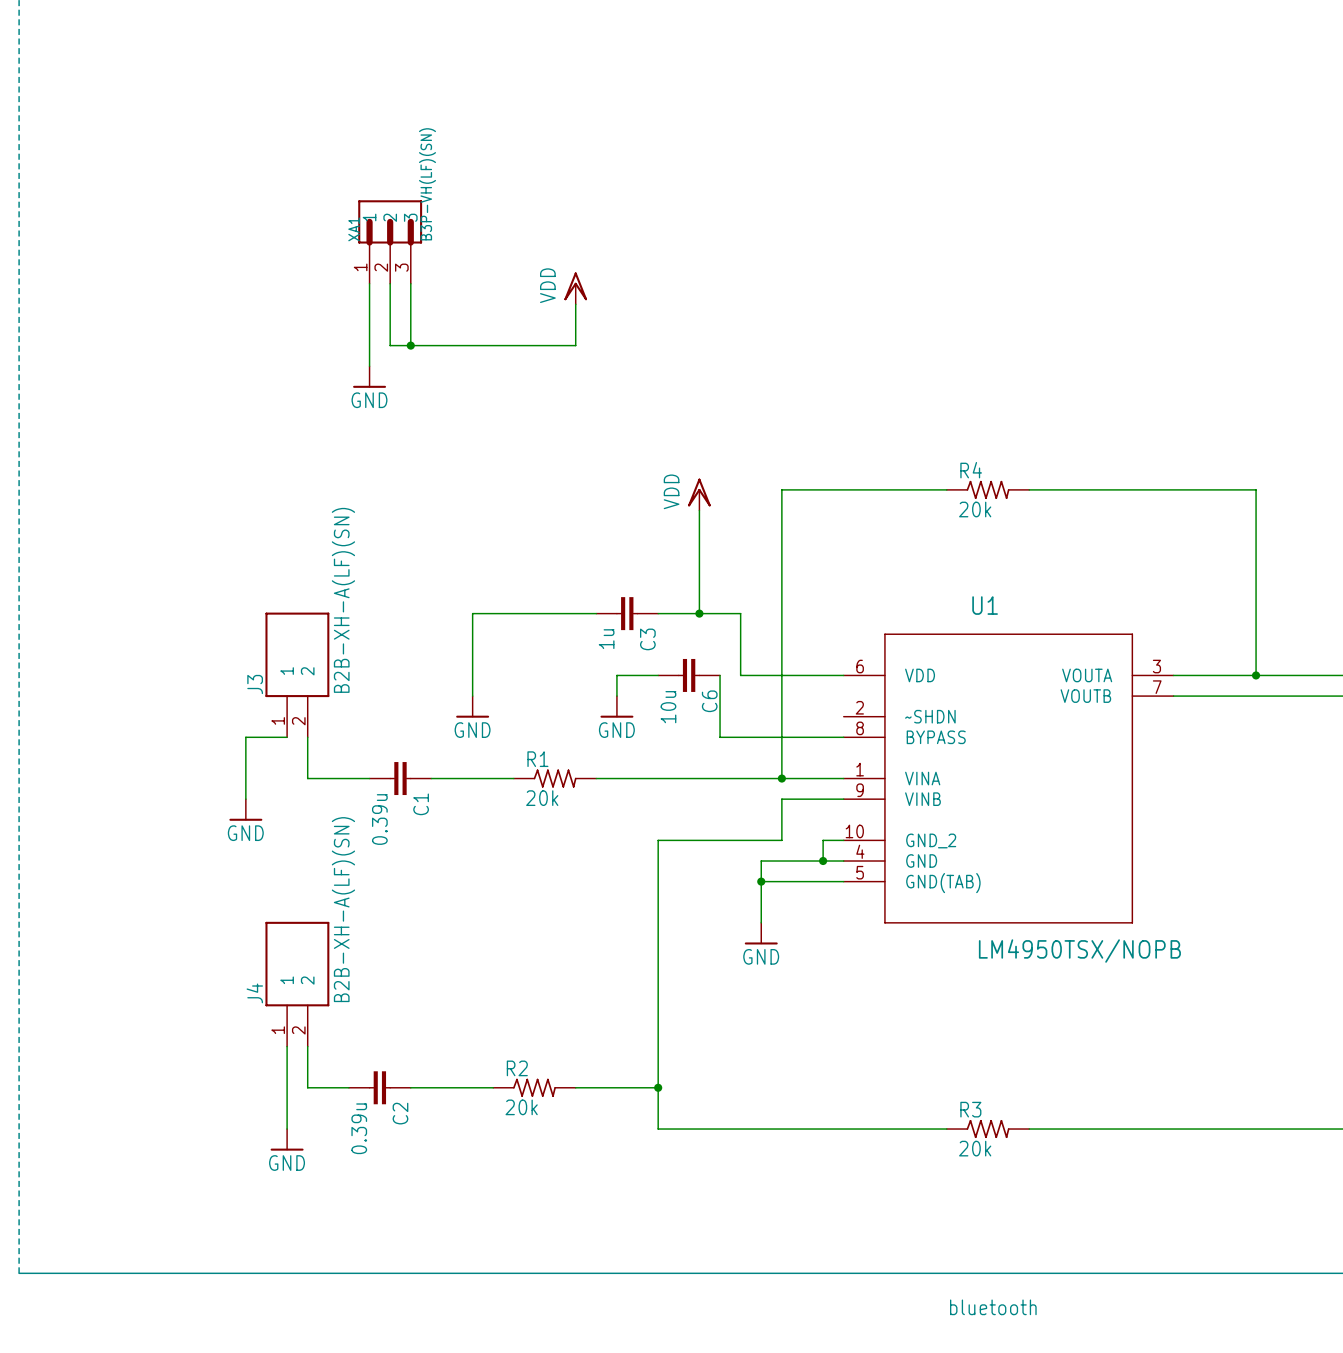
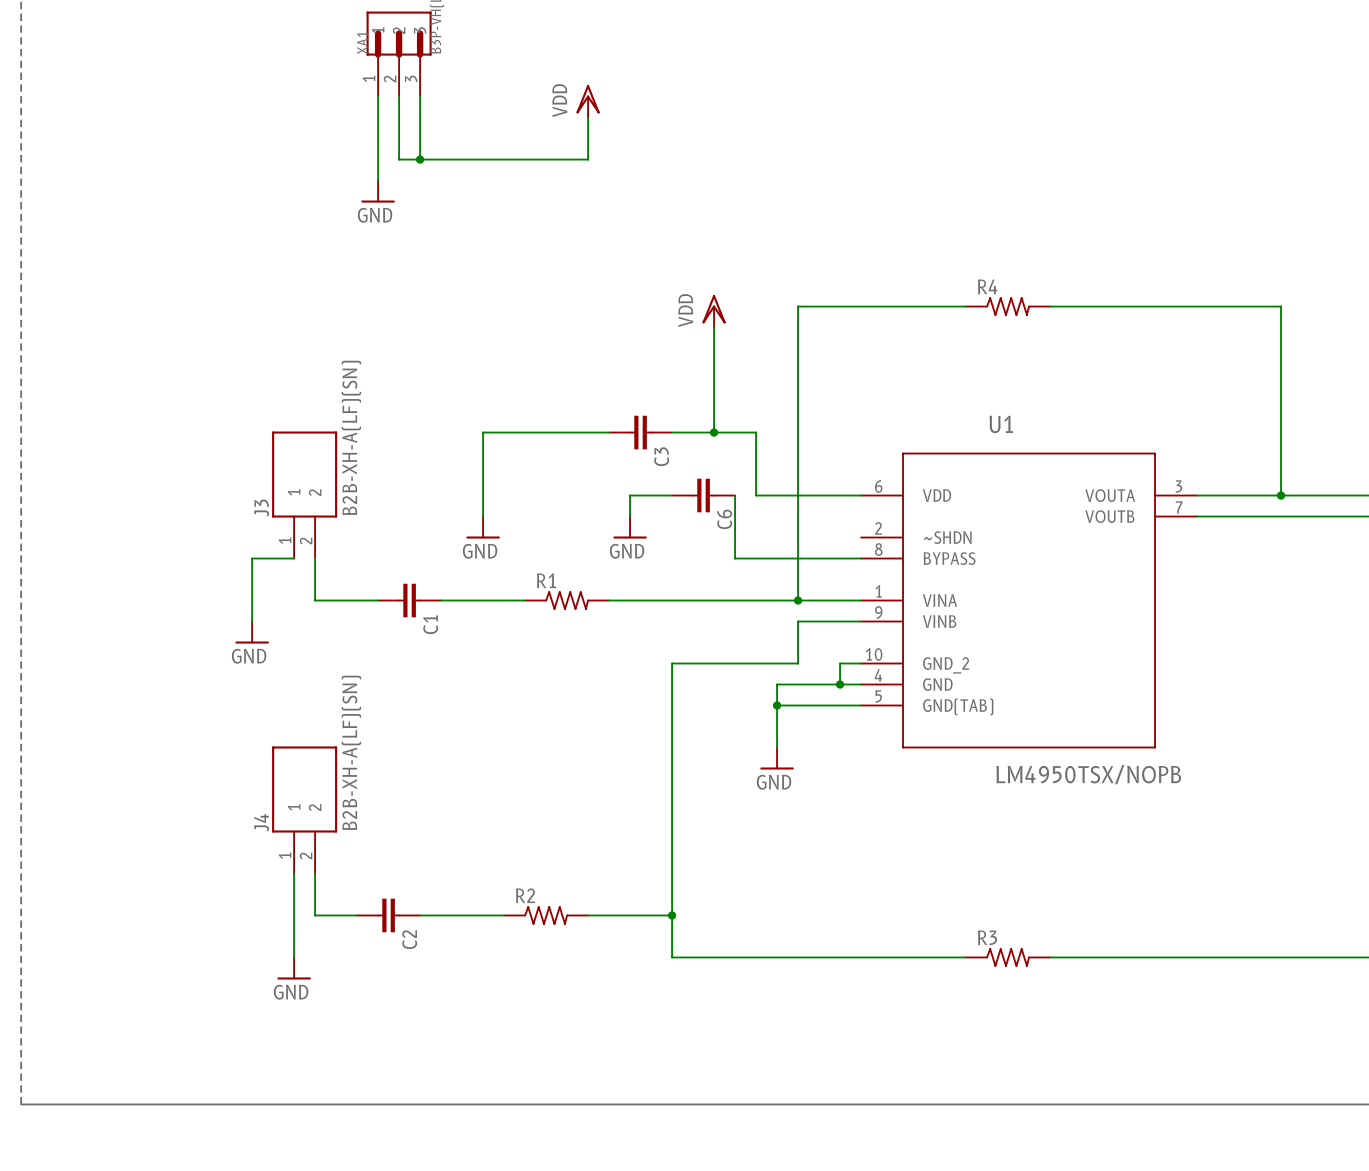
R4 value: 20k (975, 509) -> none
C3 value: 1u (606, 639) -> none
C6 value: 10u (668, 707) -> none
R1 value: 20k (542, 798) -> none
C1 value: 0.39u (379, 819) -> none
R2 value: 20k (521, 1107) -> none
C2 value: 0.39u (359, 1128) -> none
R3 value: 20k (975, 1148) -> none
text: bluetooth (993, 1307) -> none

